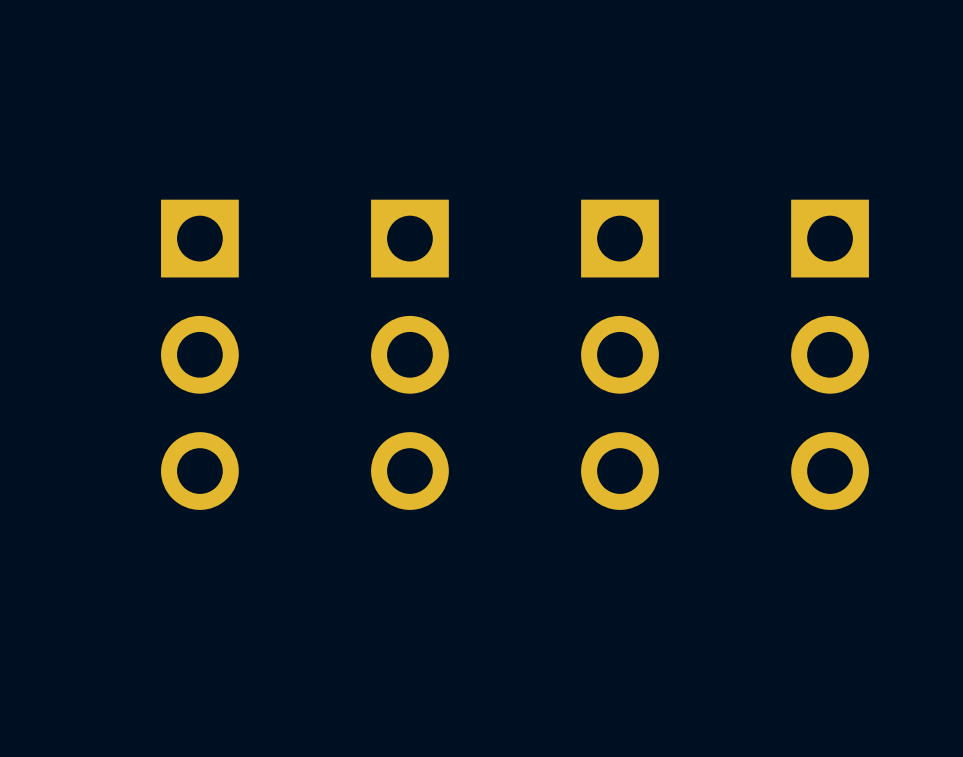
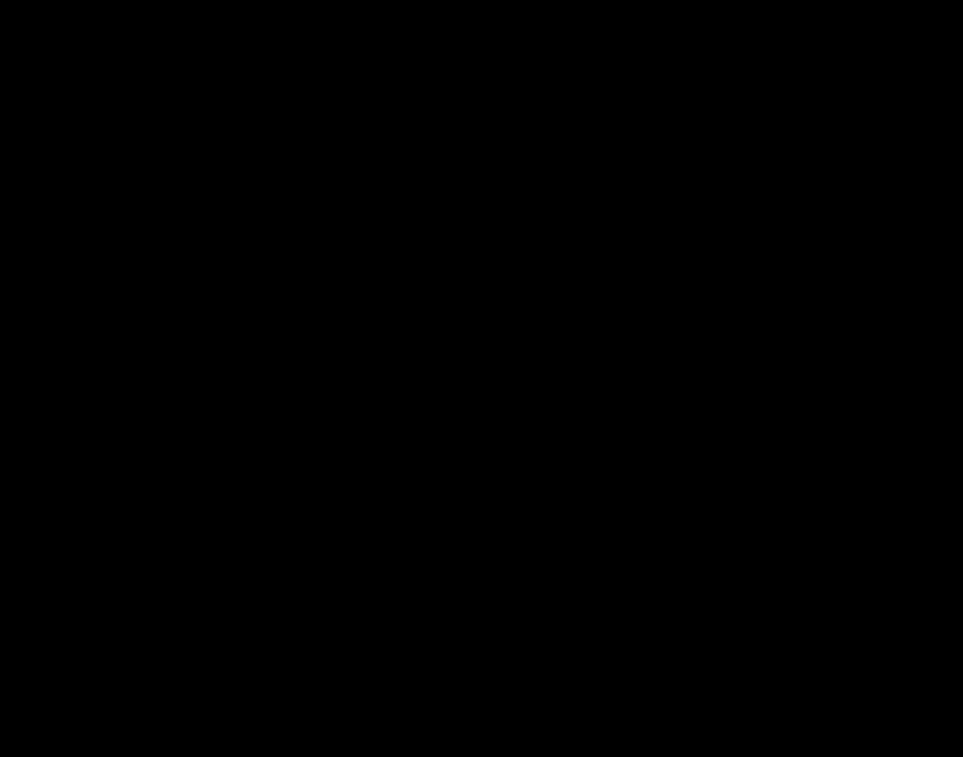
part: (199, 354) -> none
part: (409, 354) -> none
part: (619, 354) -> none
part: (830, 354) -> none

